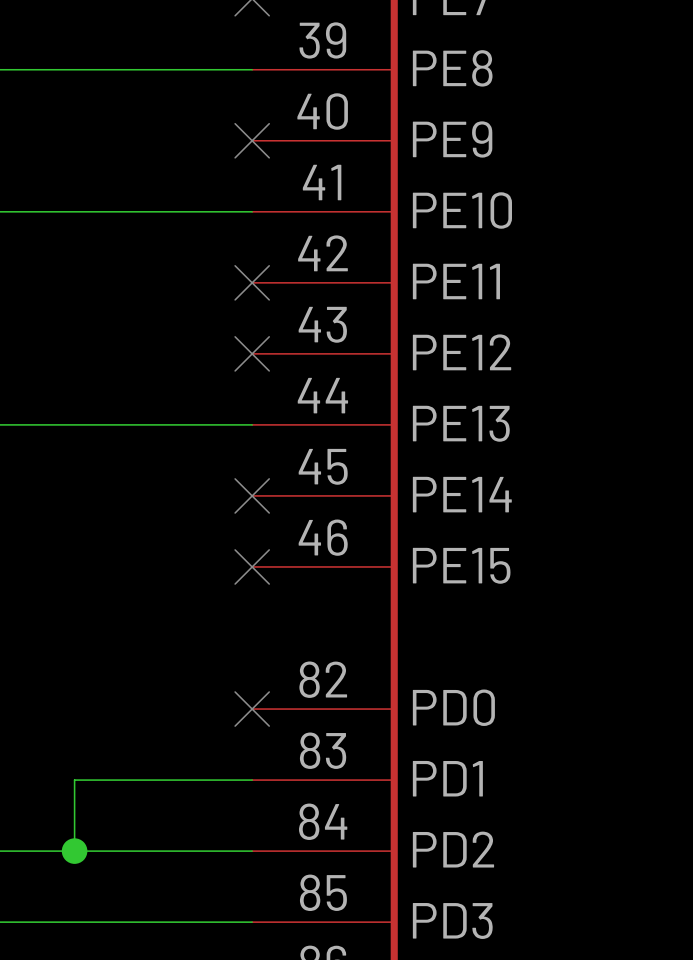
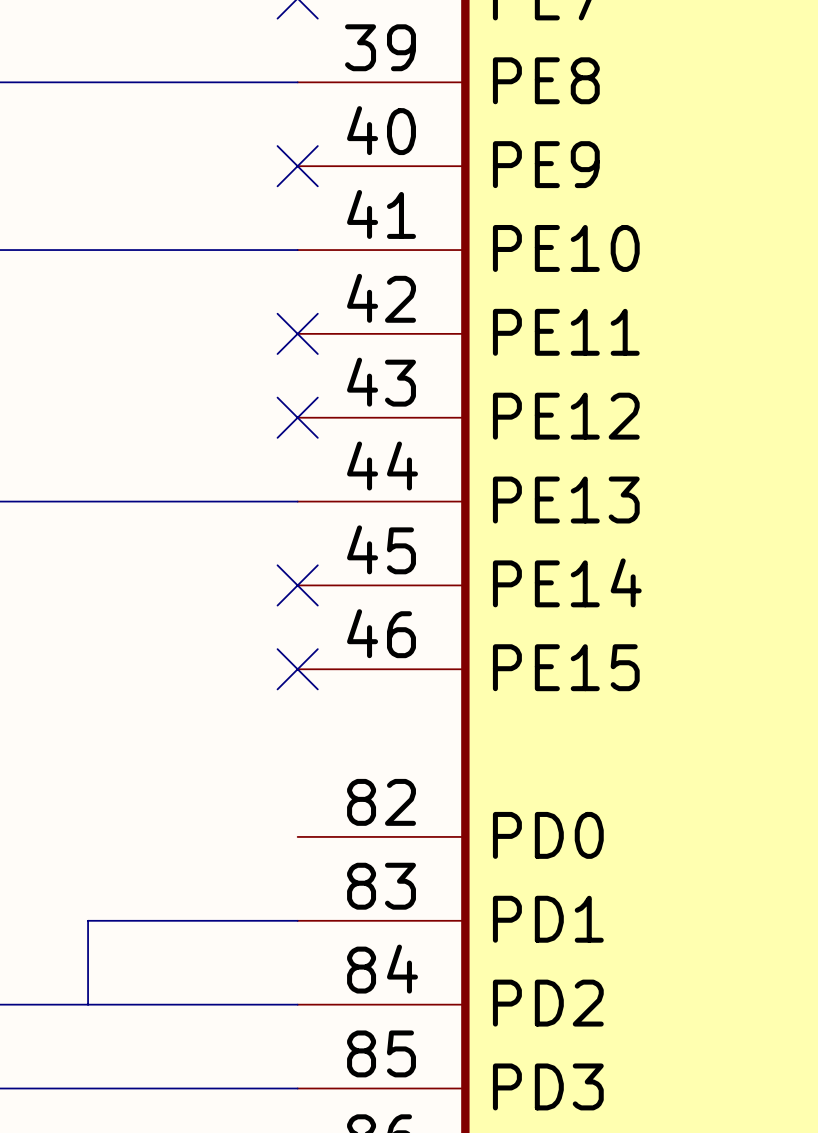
no-connect mark: (252, 709) -> none
junction: (74, 851) -> none

